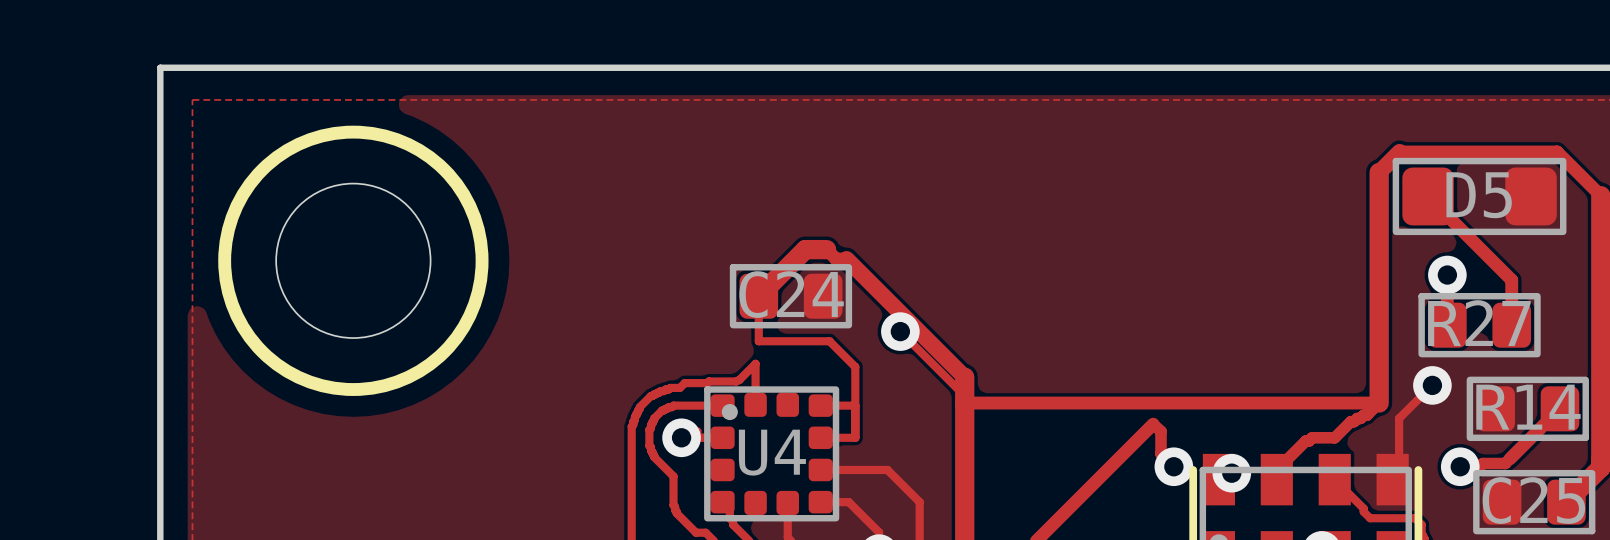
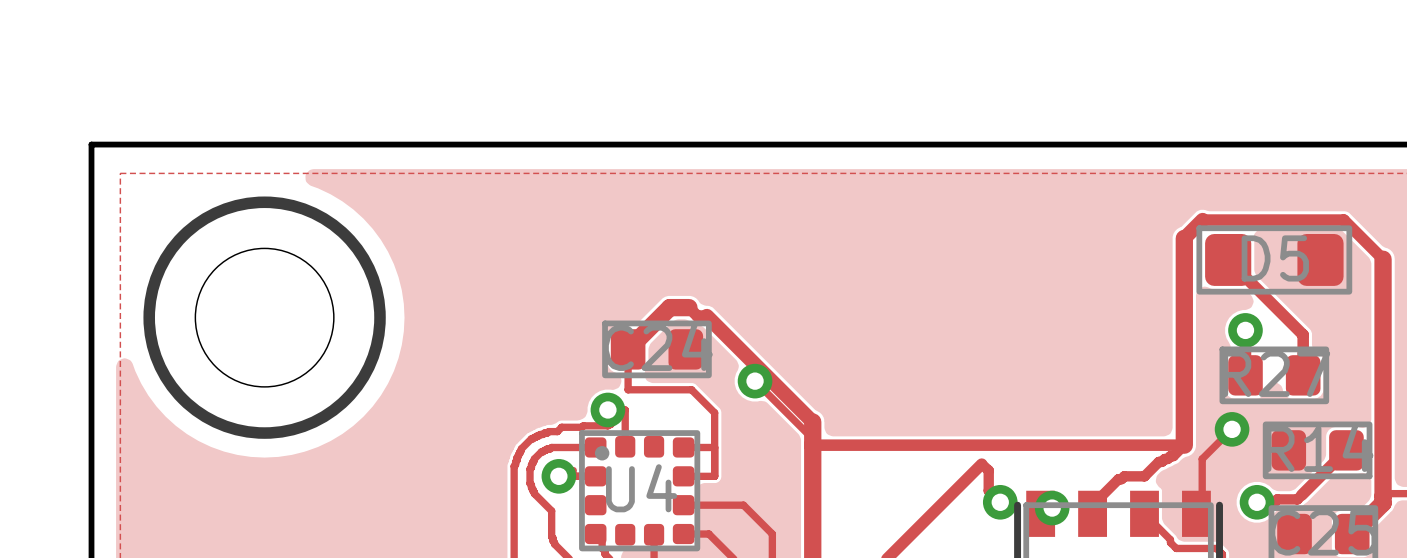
via: none -> (607, 409)

